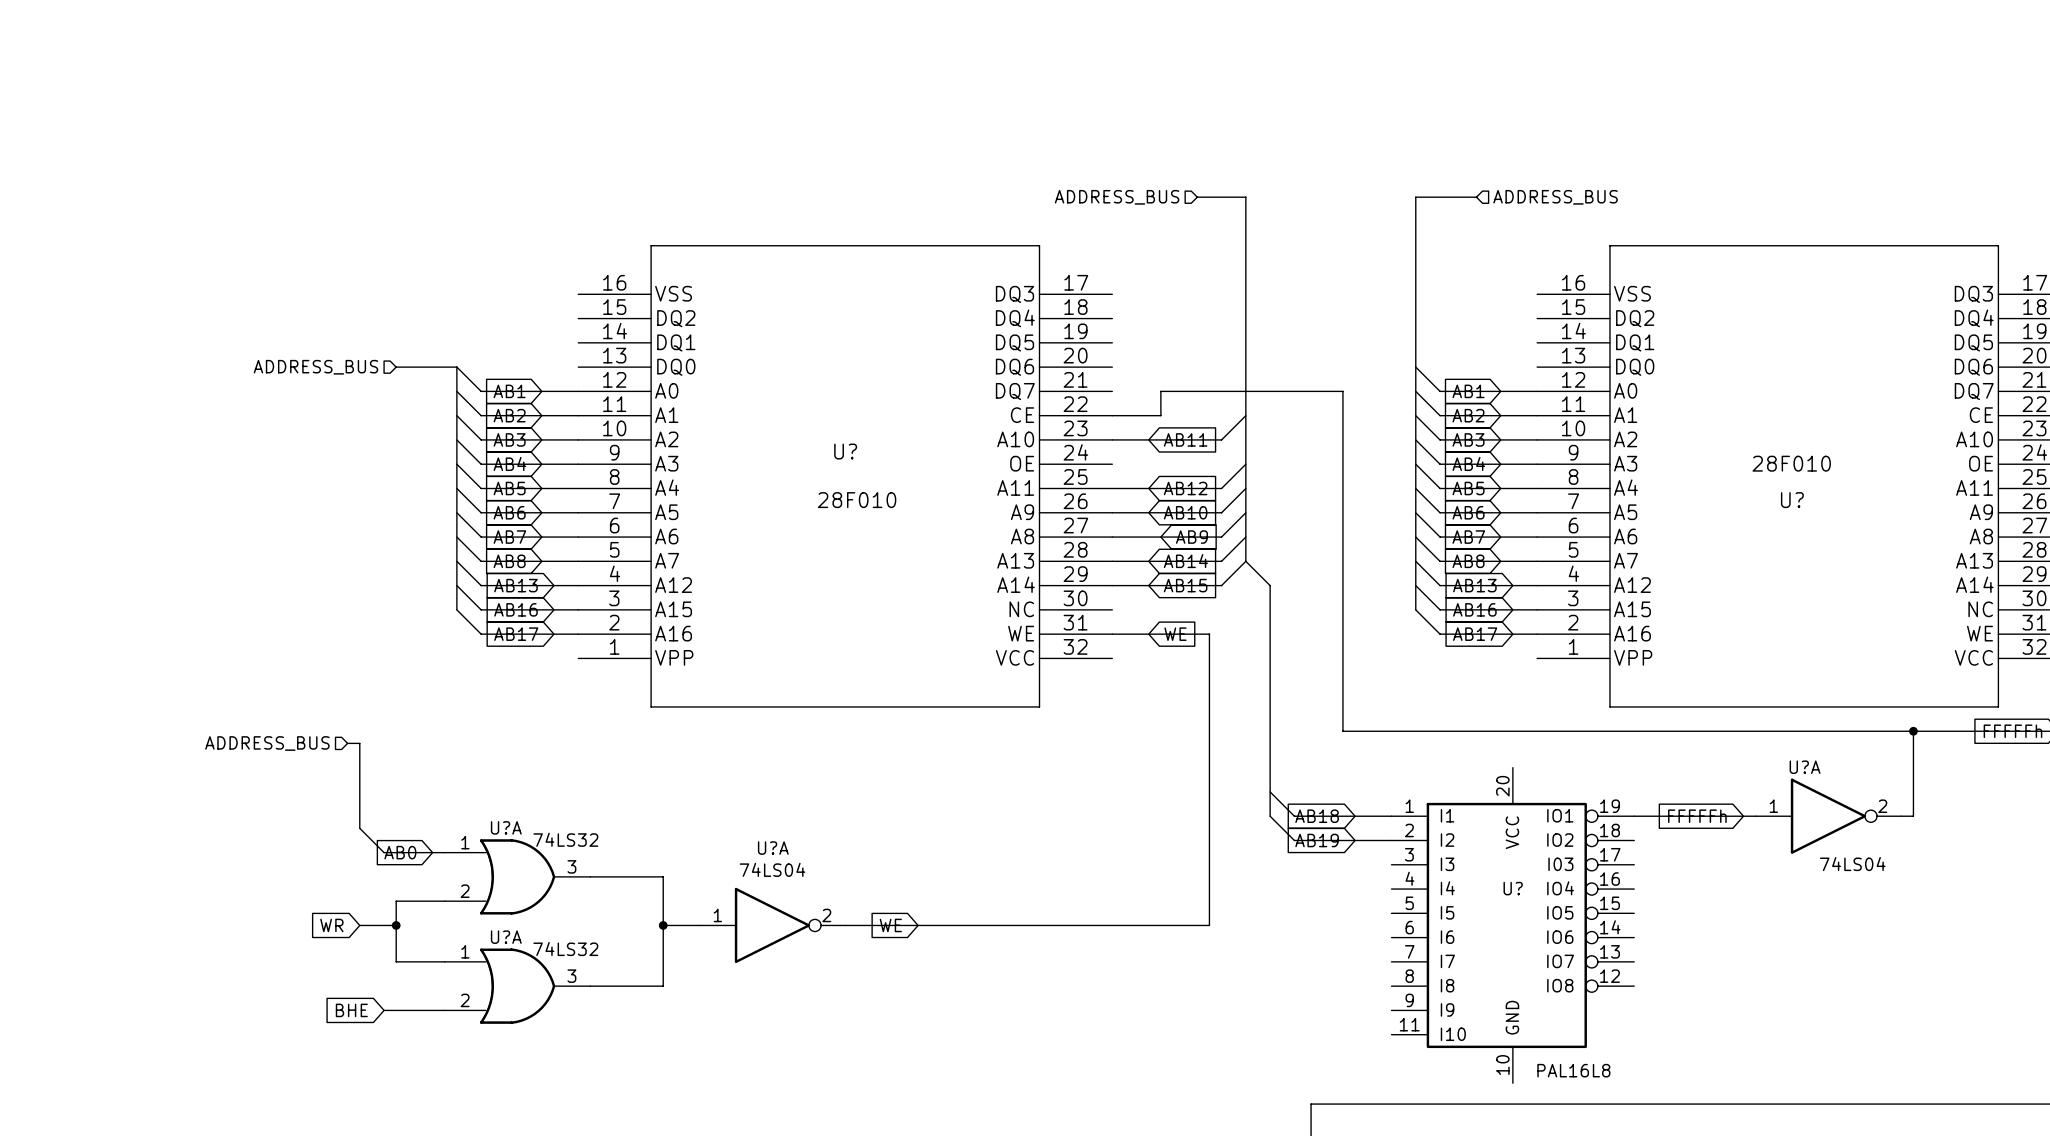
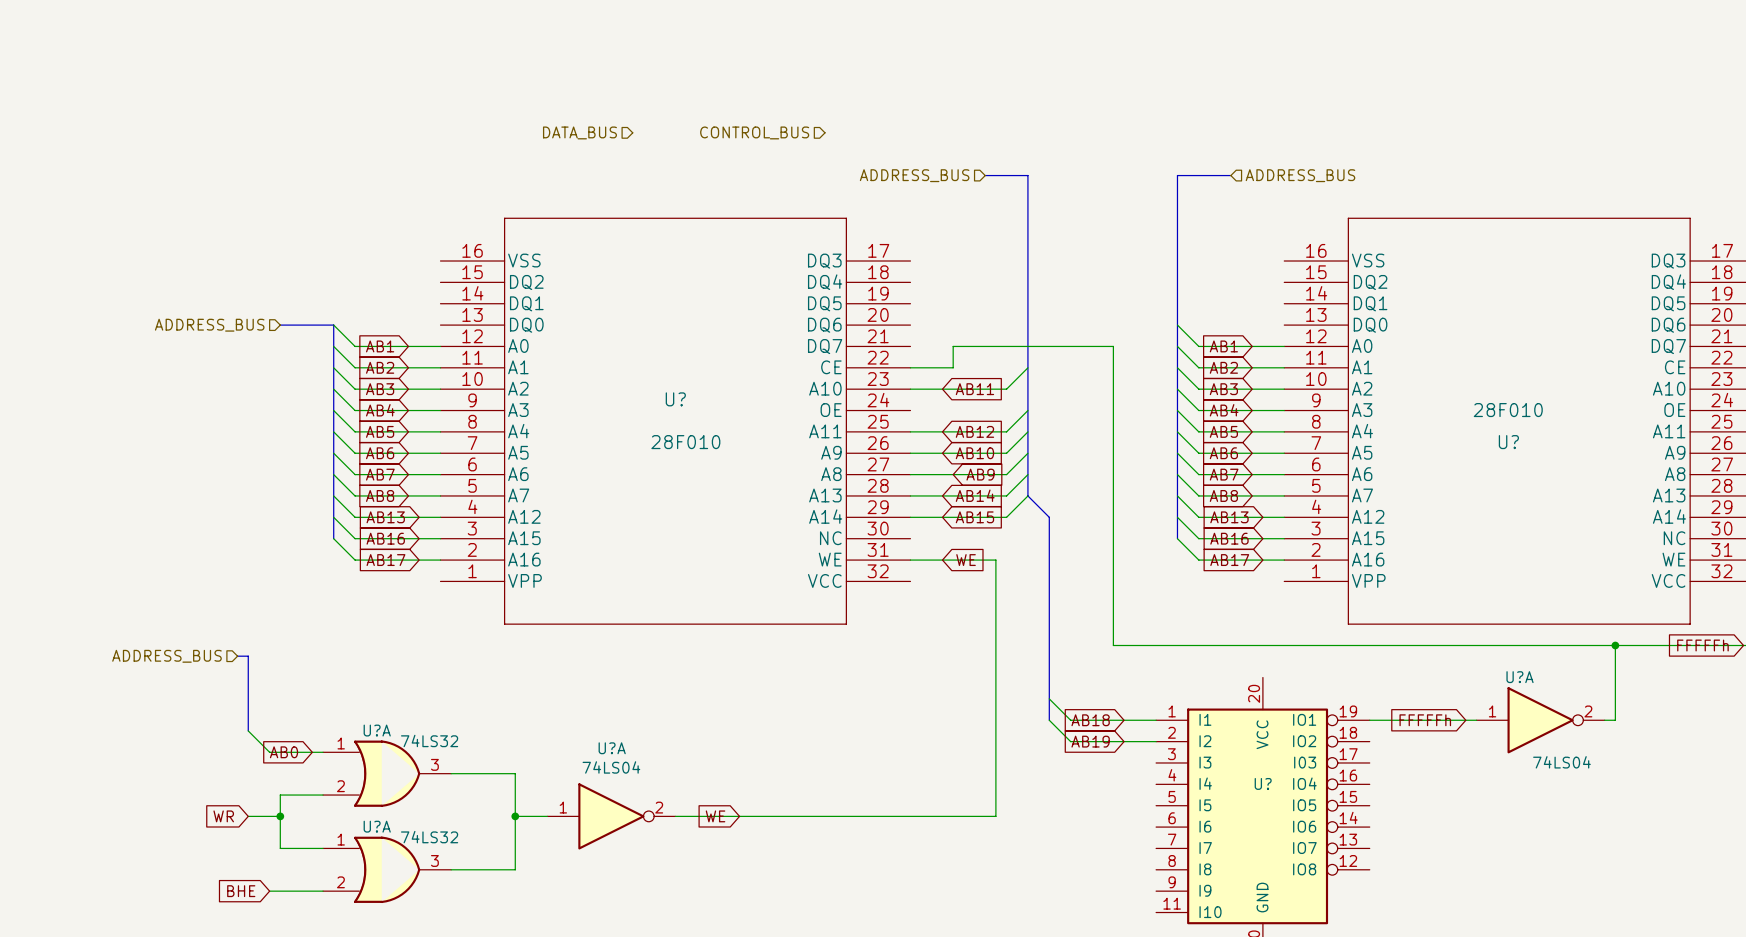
hierarchical label: none -> DATA_BUS (579, 132)
hierarchical label: none -> CONTROL_BUS (754, 132)

